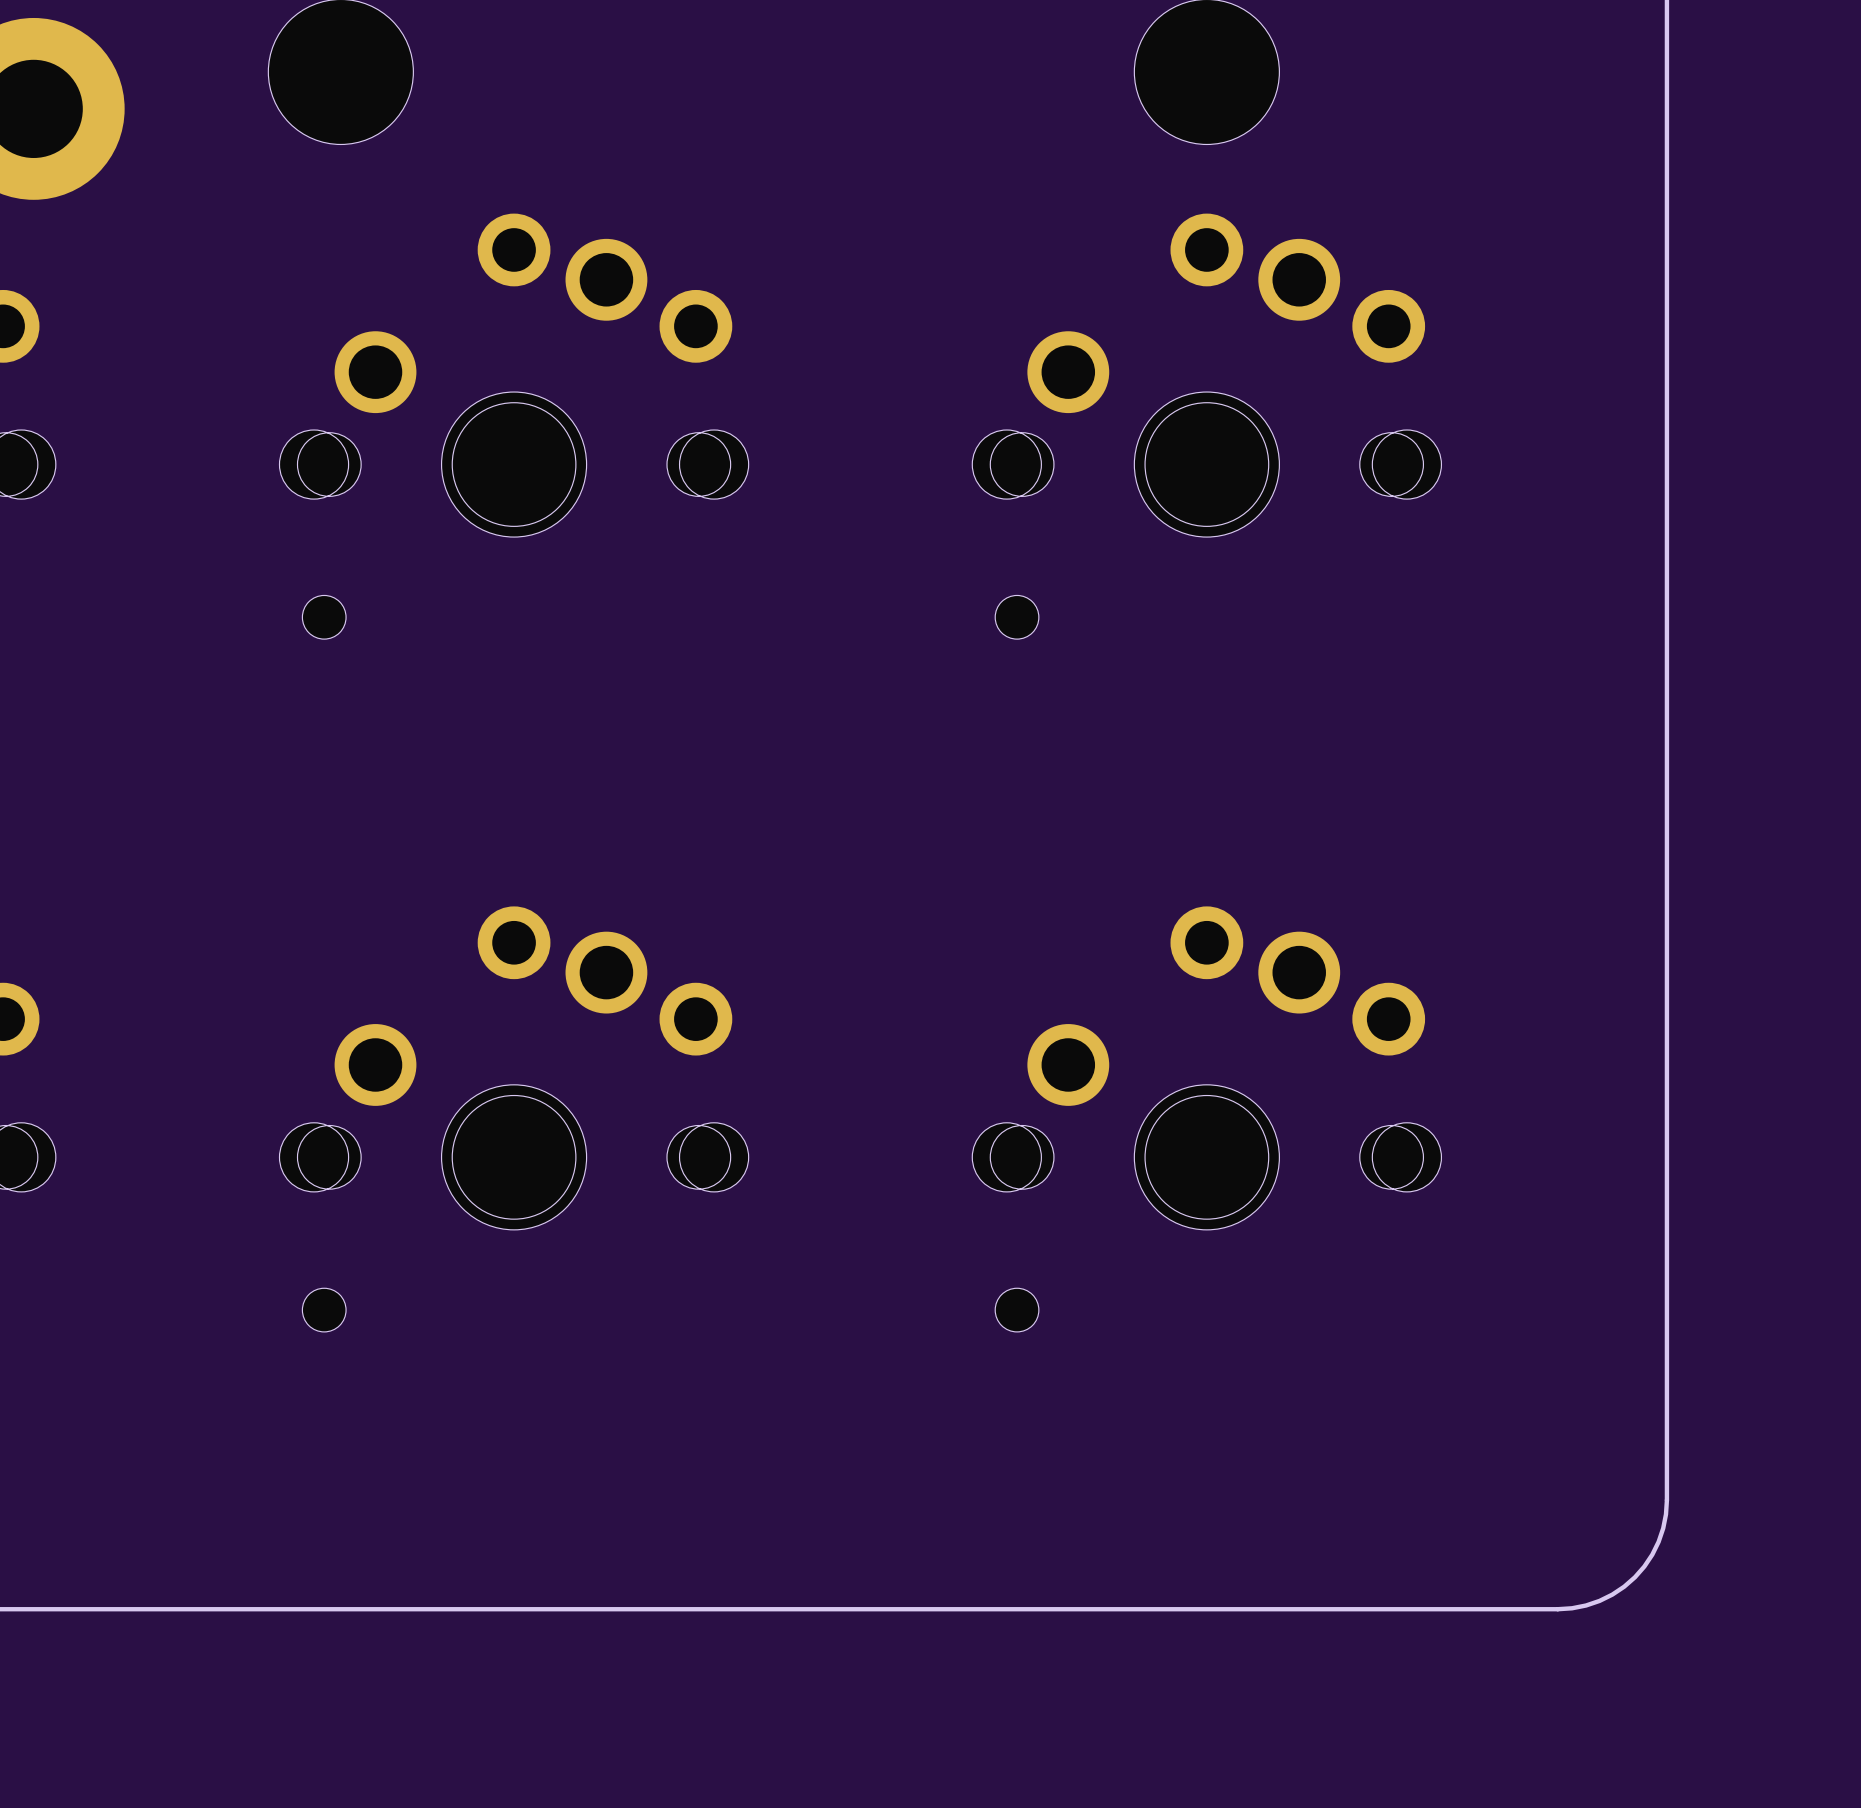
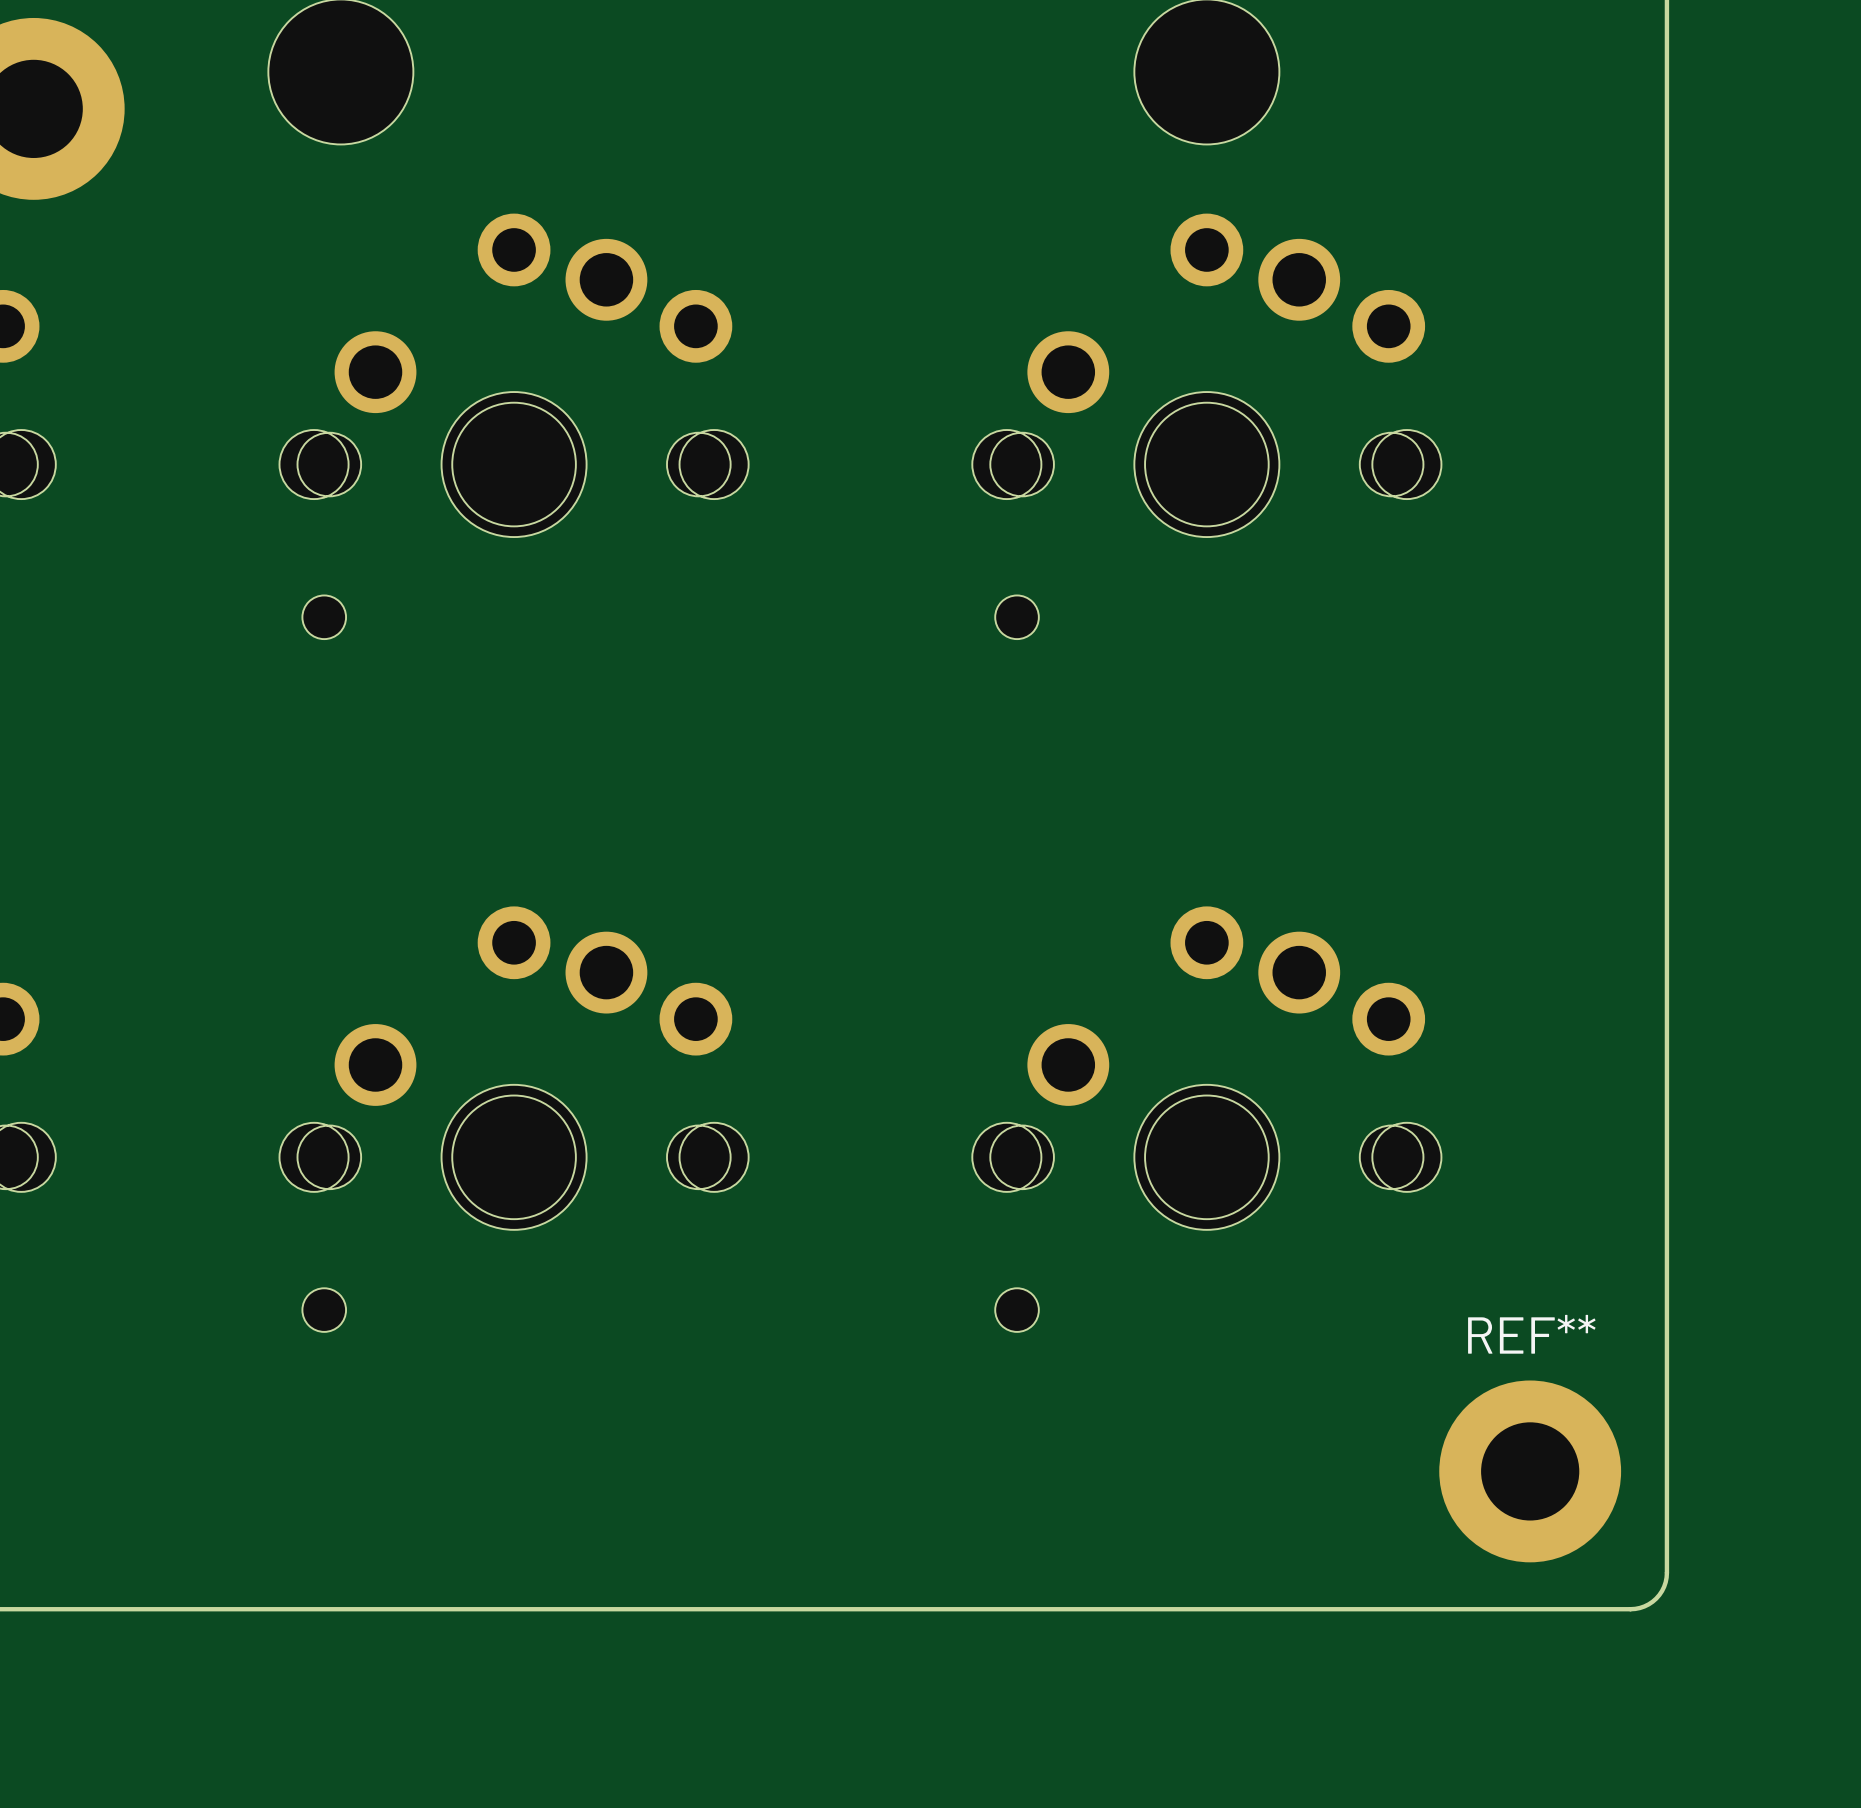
REF**: none -> (1530, 1471)
board edge: (1666, 1500) (1663, 1528) (1658, 1541) (1652, 1554) (1634, 1577) (1612, 1594) (1599, 1600) (1586, 1605) (1557, 1609) -> (1666, 1500) (1666, 1577) (1664, 1586) (1656, 1598) (1644, 1606) (1635, 1608) (1557, 1609)

